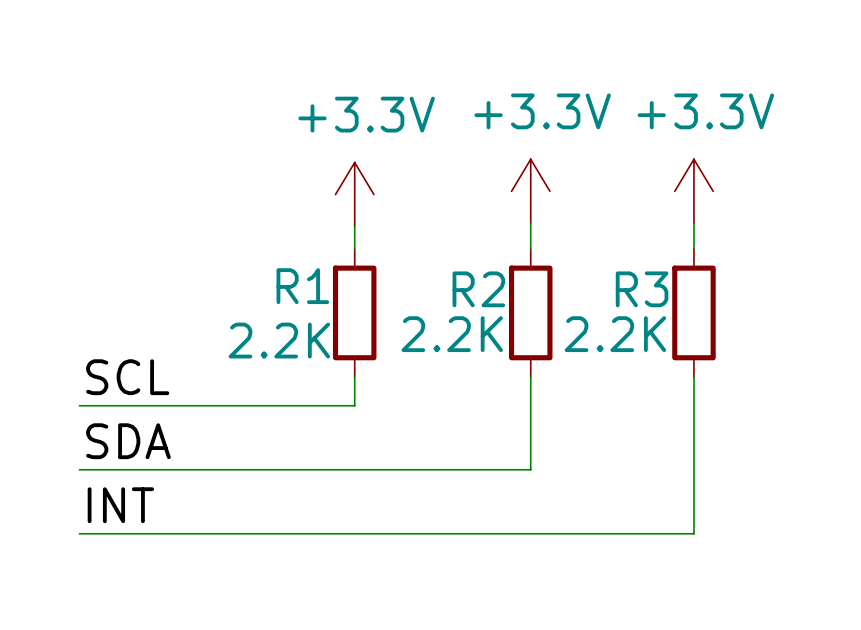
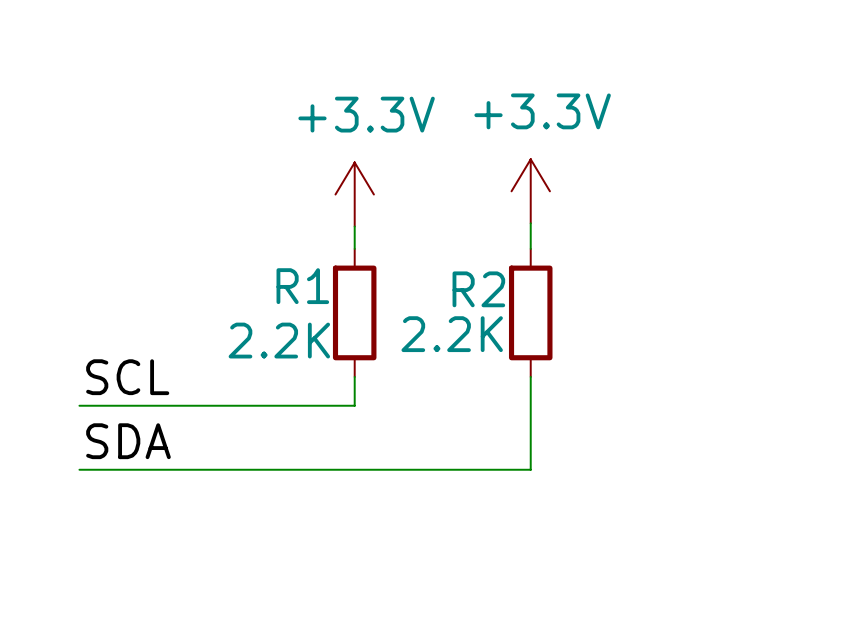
power symbol: +3.3V (693, 191) -> none
wire: (693, 223) (693, 248) -> none
R3: 2.2K (693, 312) -> none
wire: (693, 376) (693, 533) (79, 533) -> none
label: INT (120, 505) -> none

